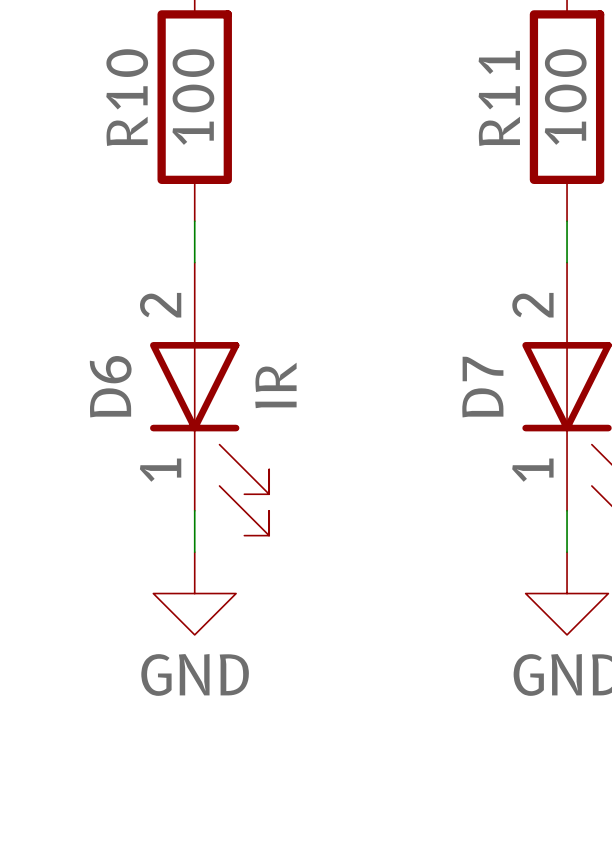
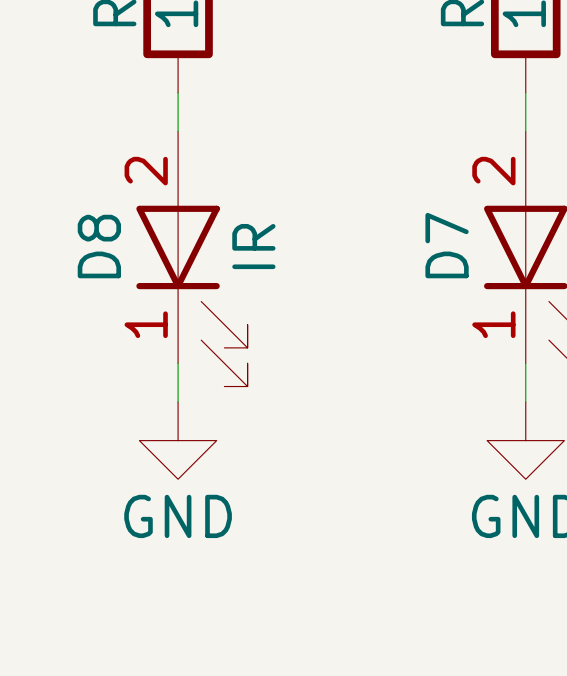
D6 name: D6 (110, 386) -> D8 (99, 246)

